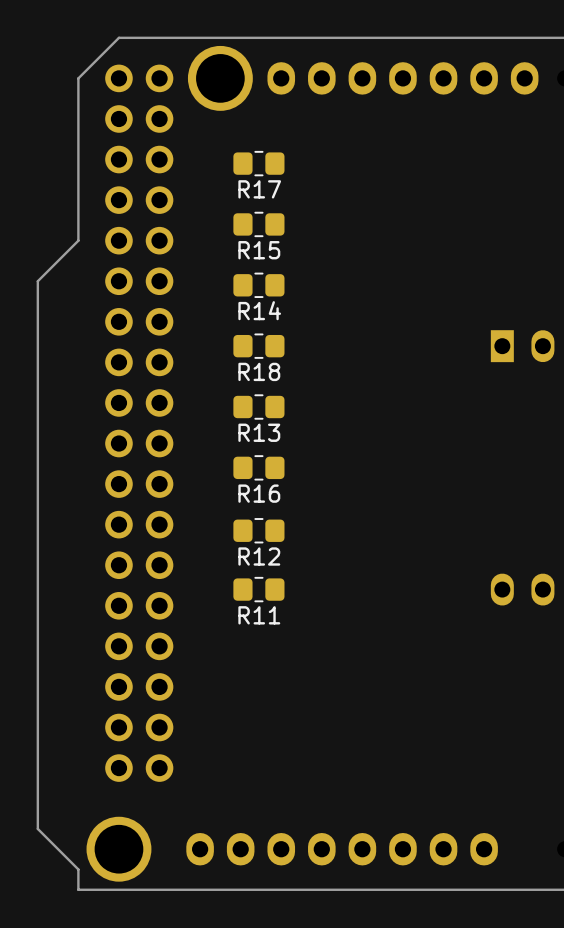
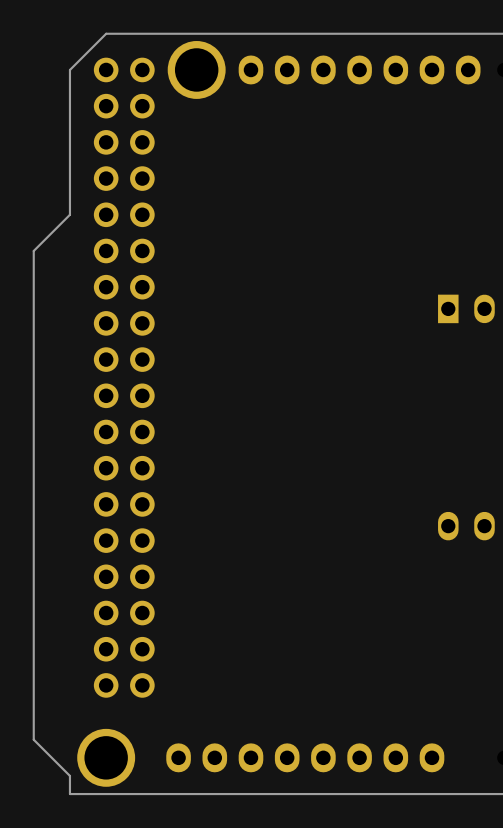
R17: (258, 163) -> none
R15: (258, 224) -> none
R14: (258, 285) -> none
R18: (258, 346) -> none
R13: (258, 407) -> none
R16: (258, 467) -> none
R12: (258, 530) -> none
R11: (258, 589) -> none

